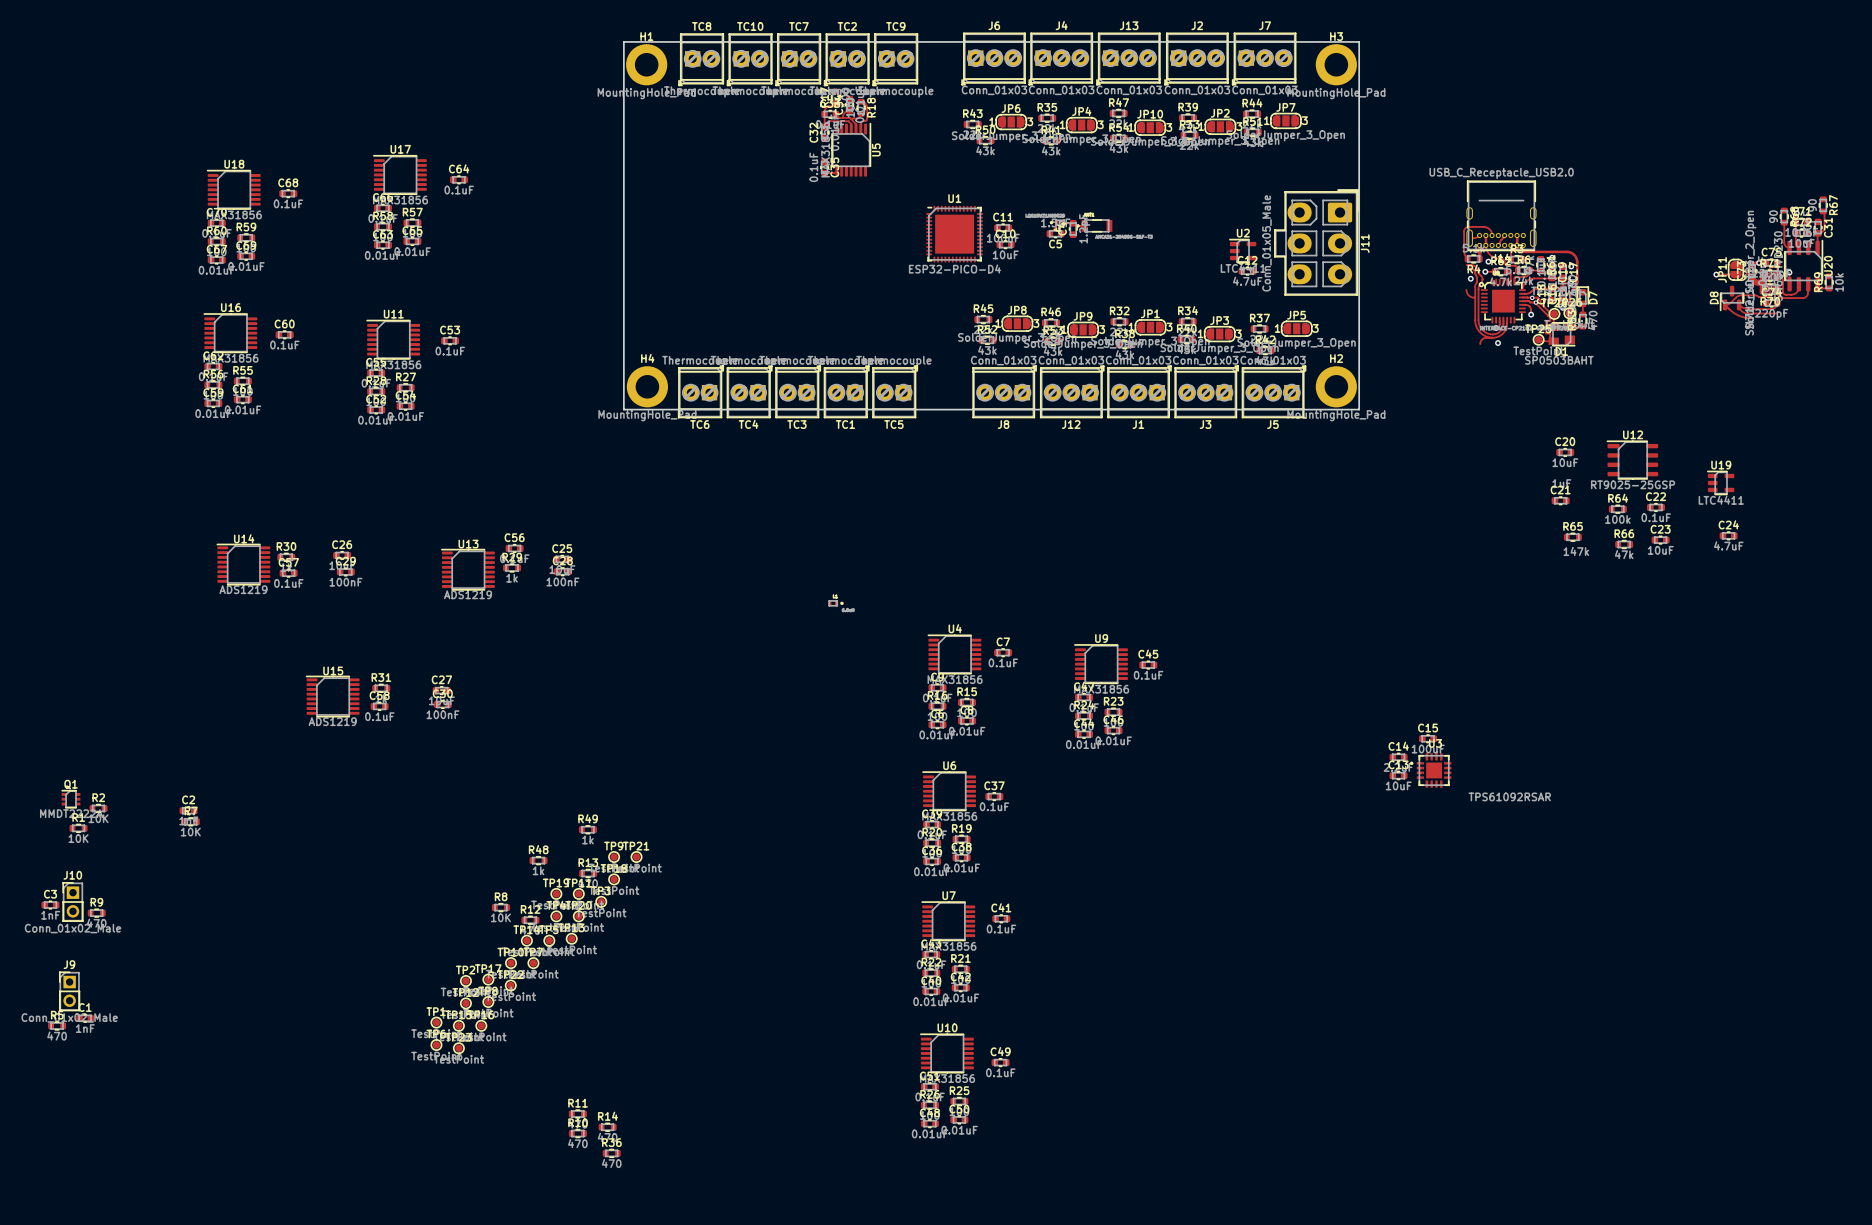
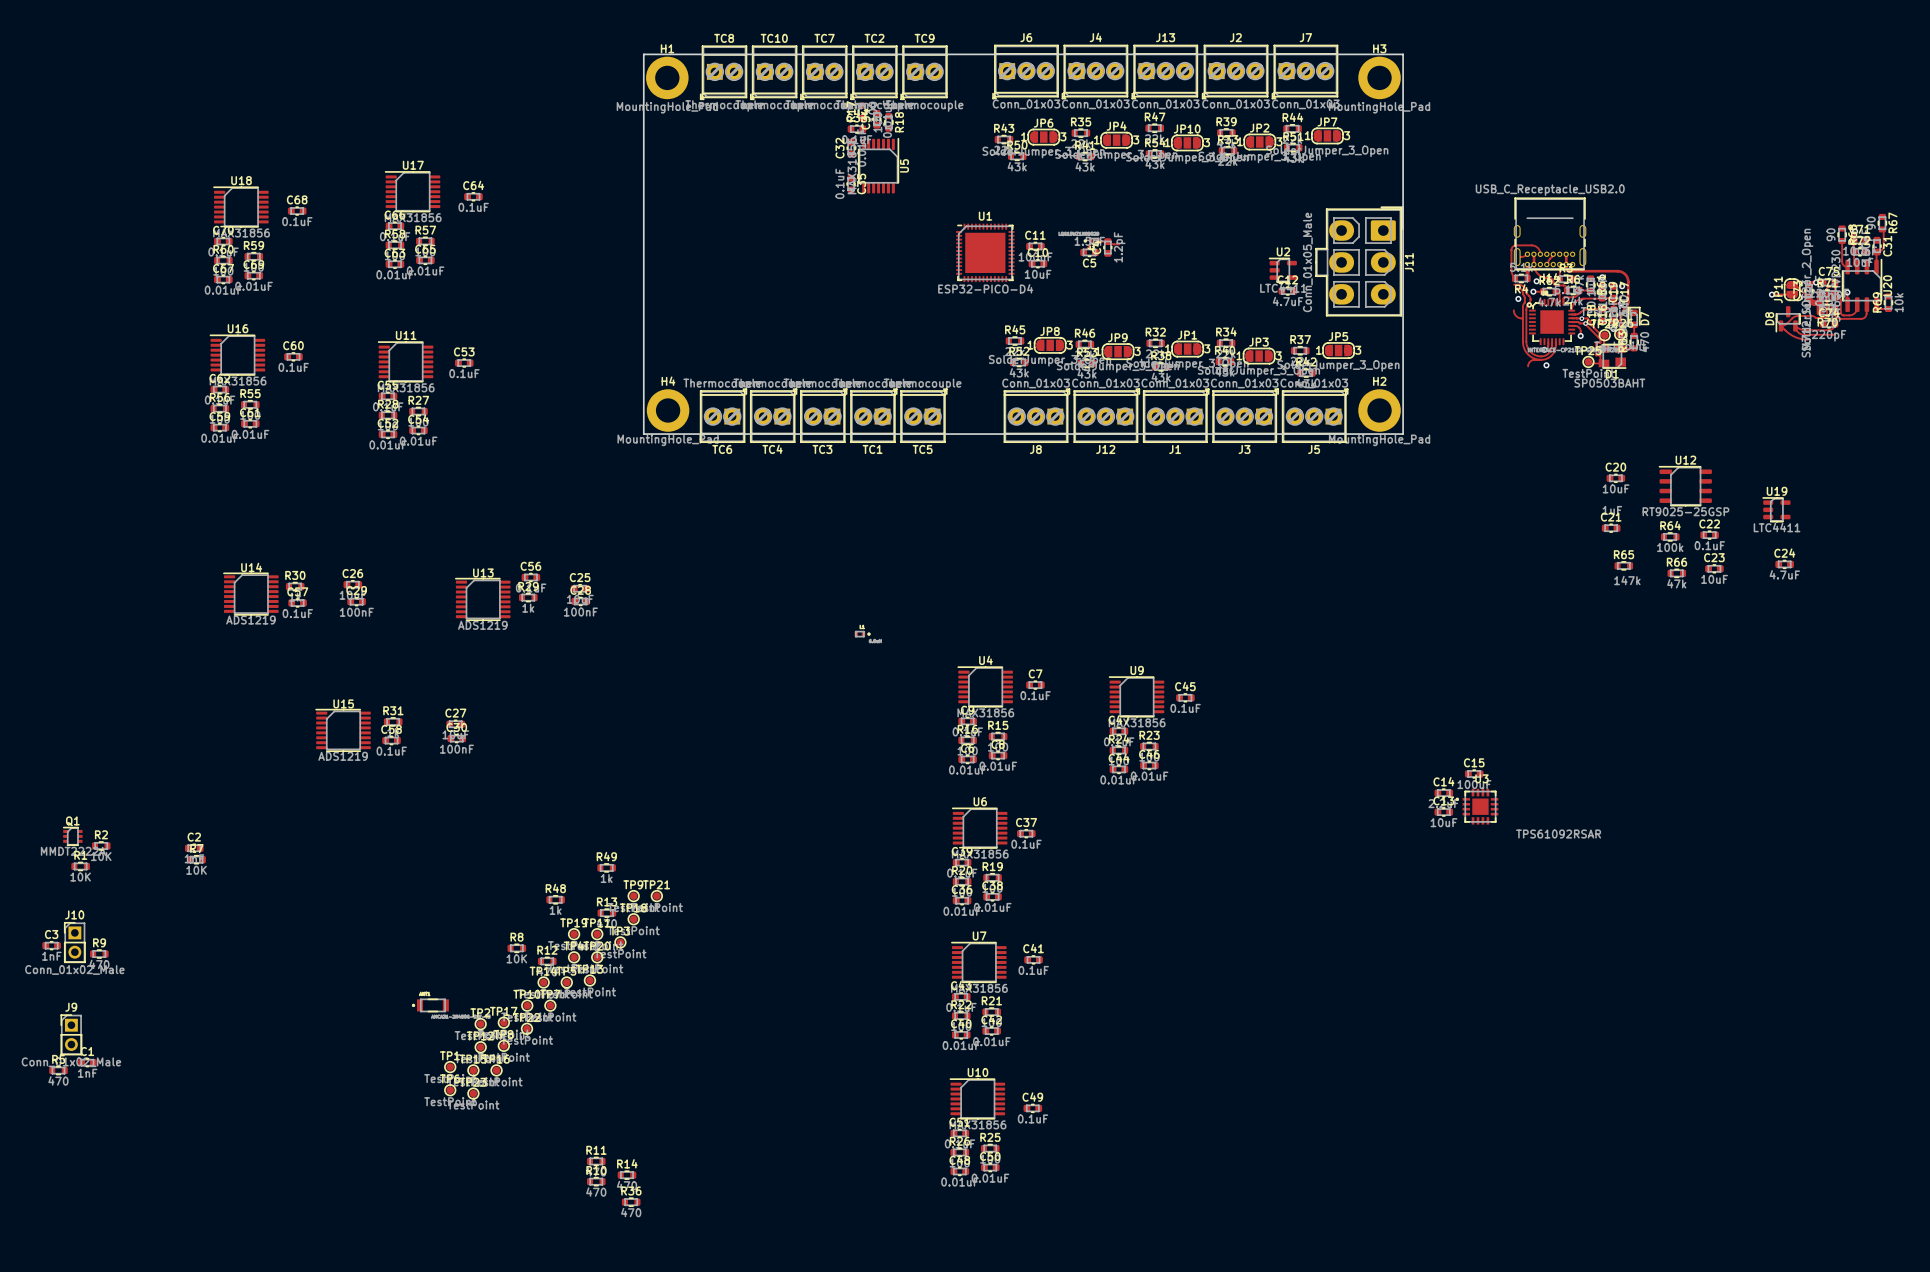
track: (861, 101) (866, 106) (867, 119) (861, 122) (860, 129) -> none
track: (835, 103) (824, 109) (824, 127) (829, 121) (848, 121) (851, 124) (851, 129) -> none
track: (849, 110) (844, 113) (843, 117) -> none
track: (861, 113) (858, 118) (850, 118) -> none
track: (835, 114) (838, 117) (849, 117) (856, 124) (856, 129) -> none
track: (836, 171) (824, 173) -> none
part position: (1094, 225) -> (430, 1005)

